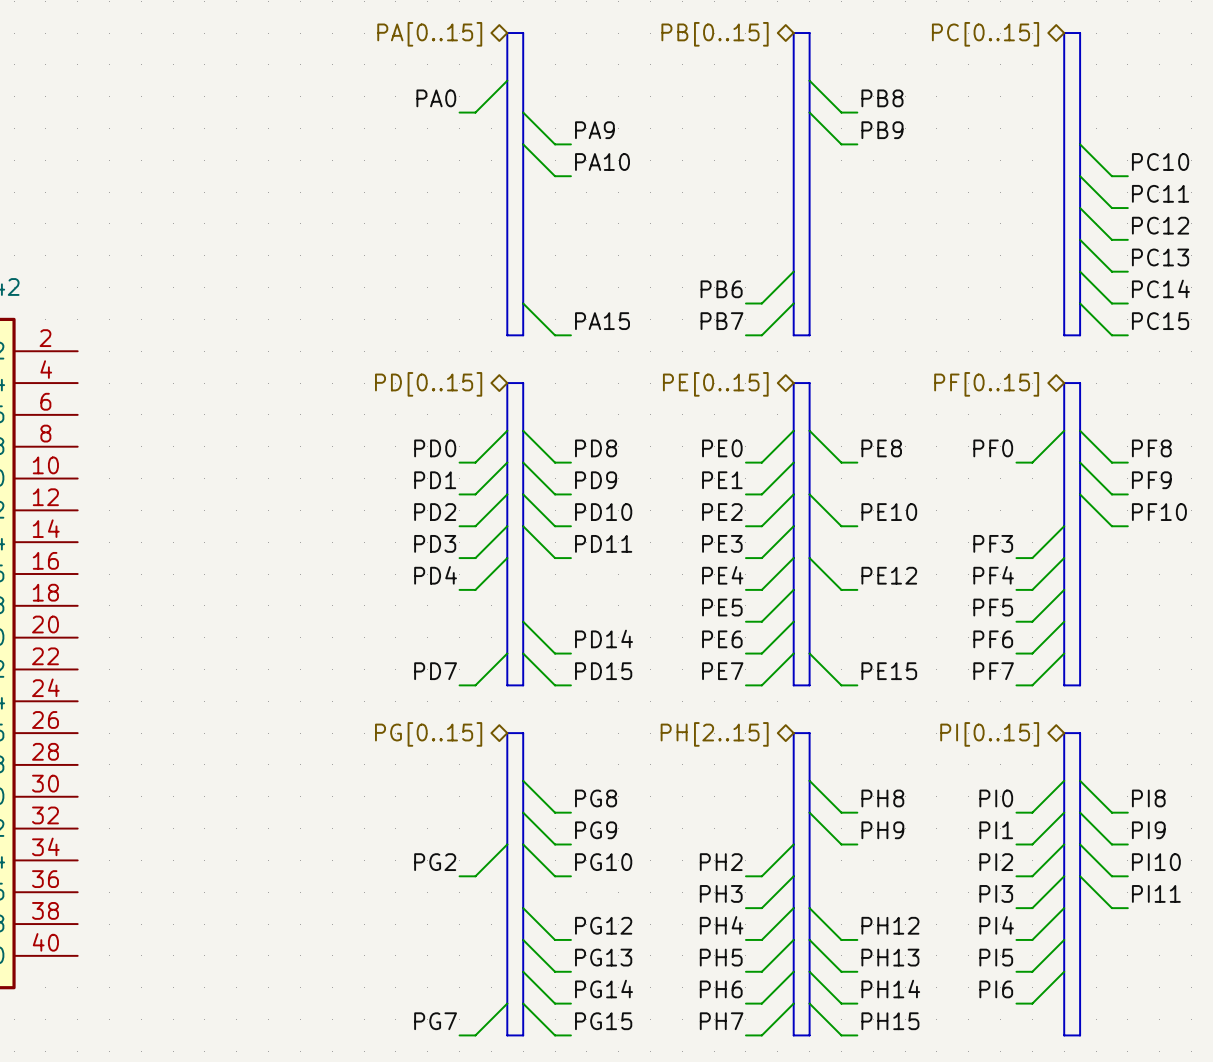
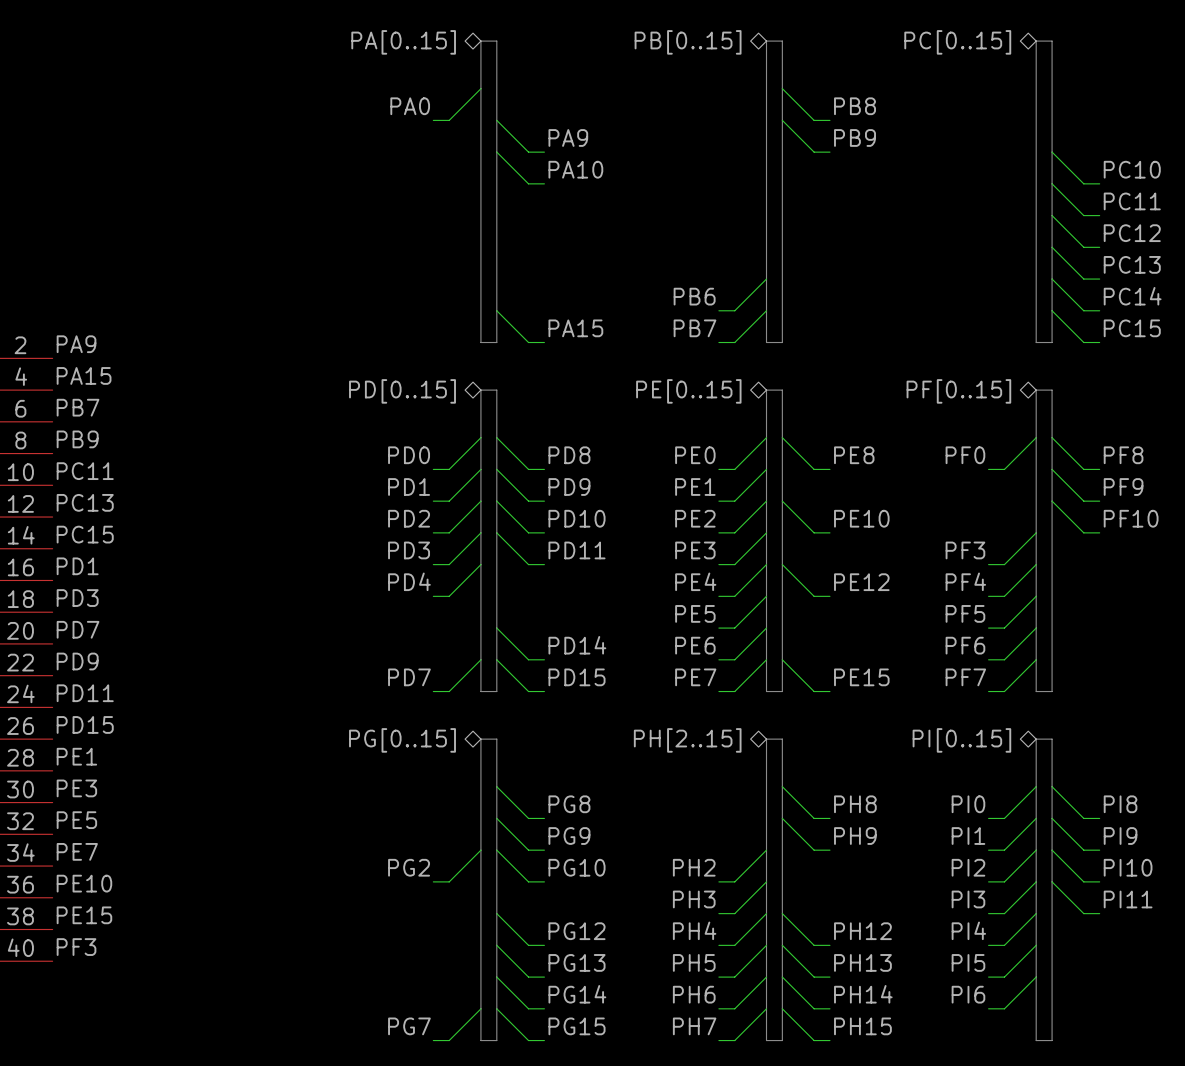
label: none -> PA9 (76, 344)
label: none -> PA15 (84, 375)
label: none -> PB7 (78, 407)
label: none -> PB9 (77, 439)
label: none -> PC11 (85, 471)
label: none -> PC13 (85, 502)
label: none -> PC15 (85, 534)
label: none -> PD1 (77, 566)
label: none -> PD3 (77, 598)
label: none -> PD7 (78, 629)
label: none -> PD9 (77, 661)
label: none -> PD11 (85, 693)
label: none -> PD15 (85, 724)
label: none -> PE1 (76, 756)
label: none -> PE3 (76, 788)
label: none -> PE5 (76, 820)
label: none -> PE7 (77, 851)
label: none -> PE10 (84, 883)
label: none -> PE15 (84, 915)
label: none -> PF3 (76, 947)

